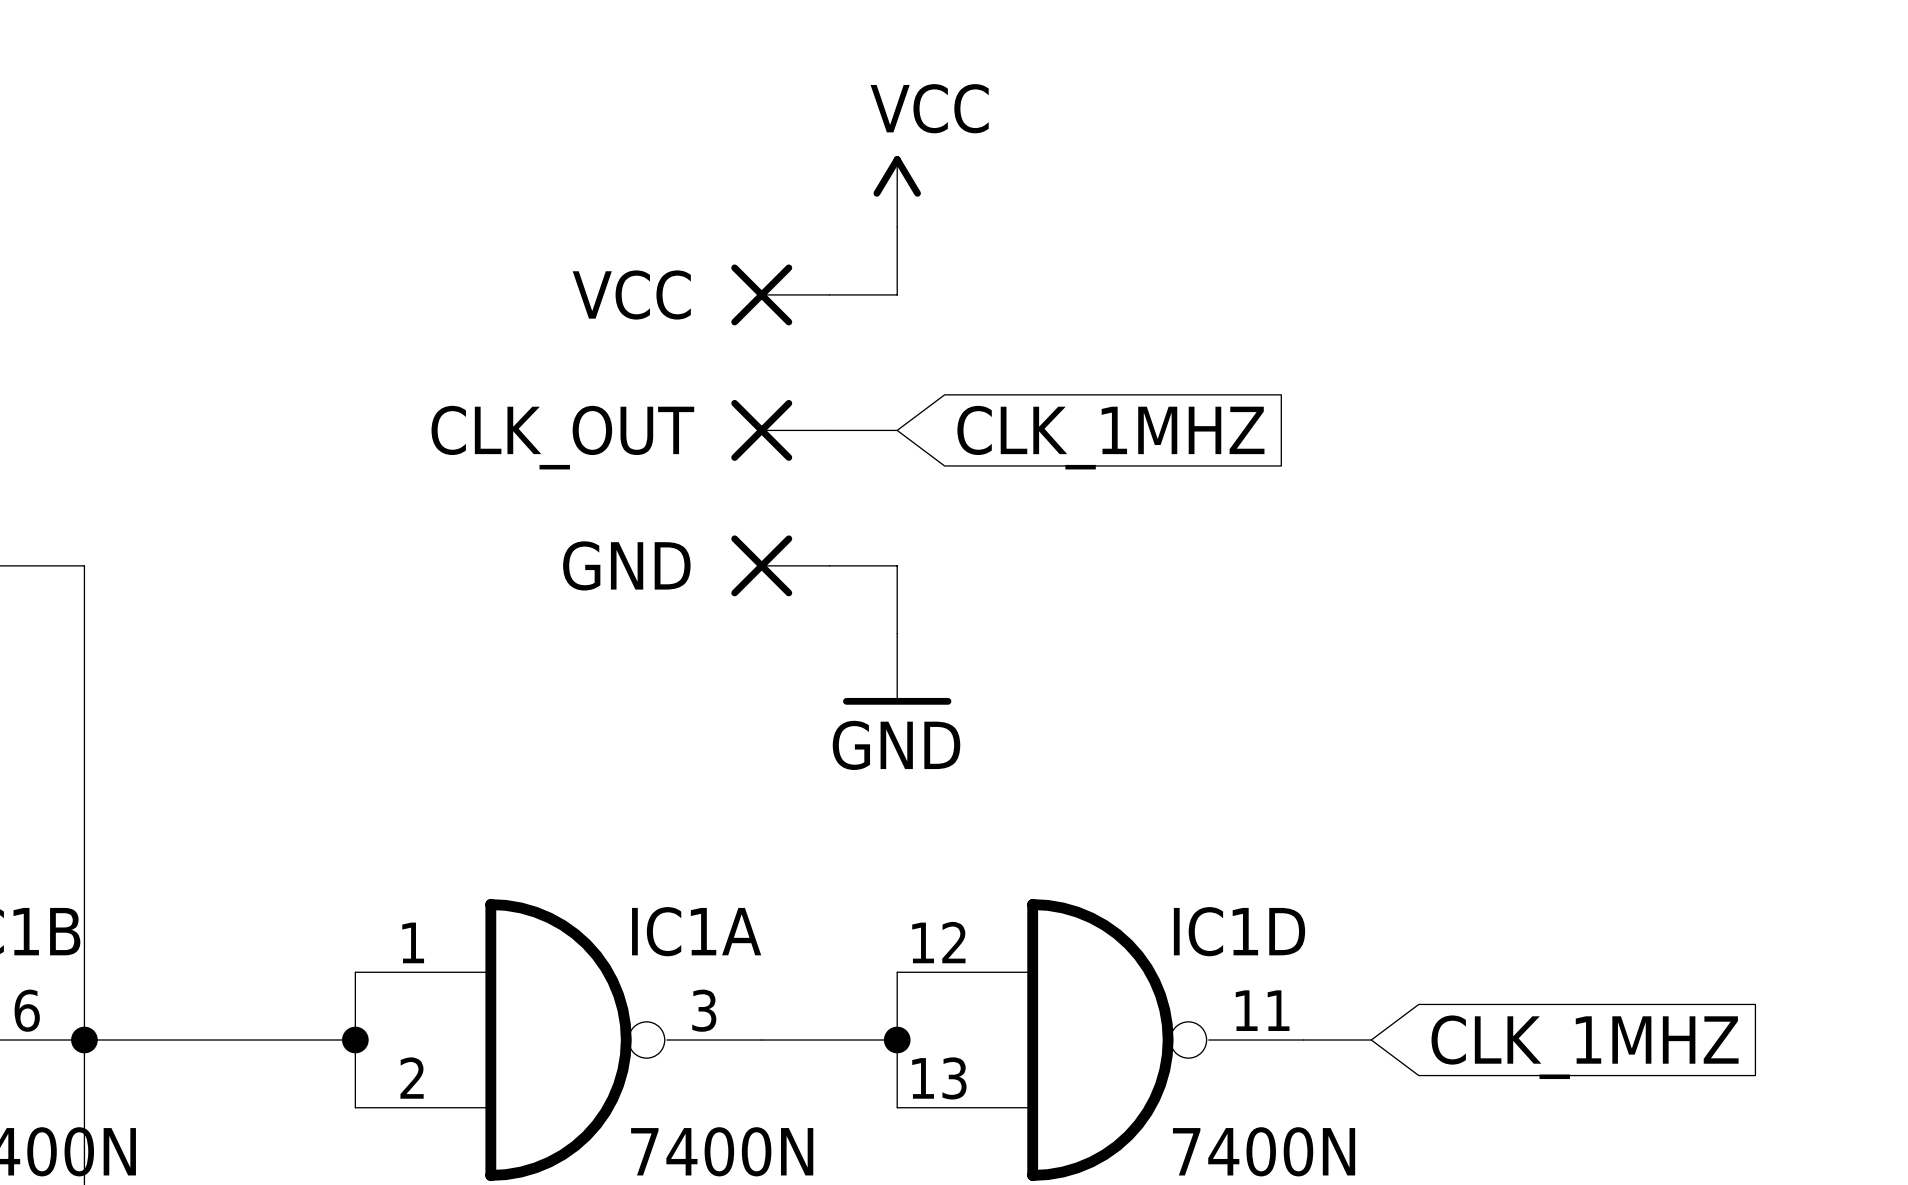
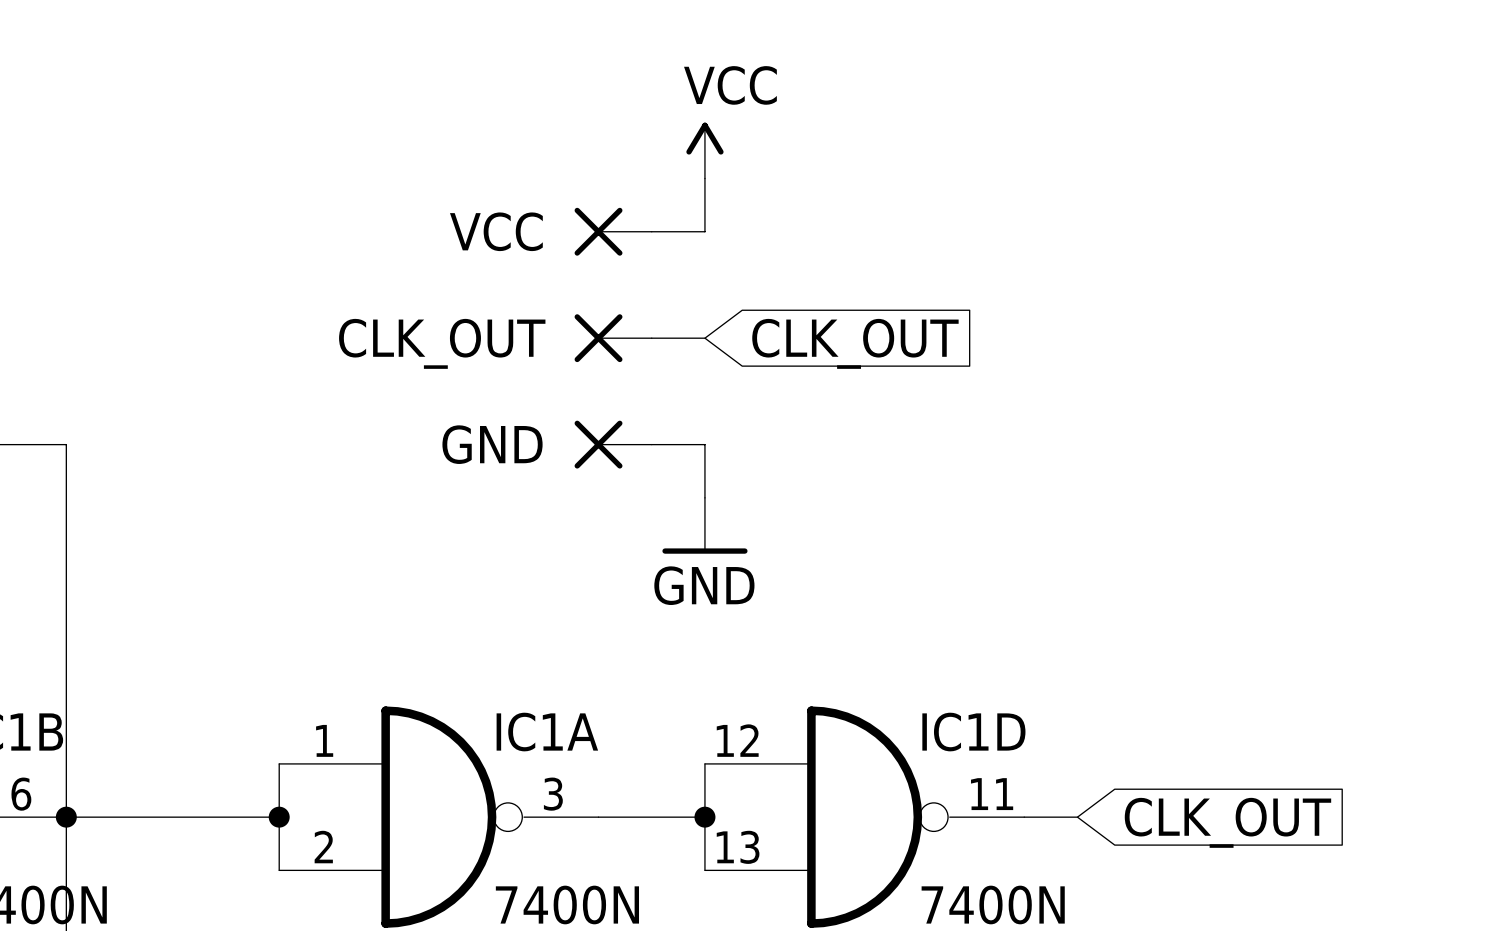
global label: CLK_1MHZ (1110, 437) -> CLK_OUT (855, 343)
global label: CLK_1MHZ (1585, 1047) -> CLK_OUT (1227, 822)

